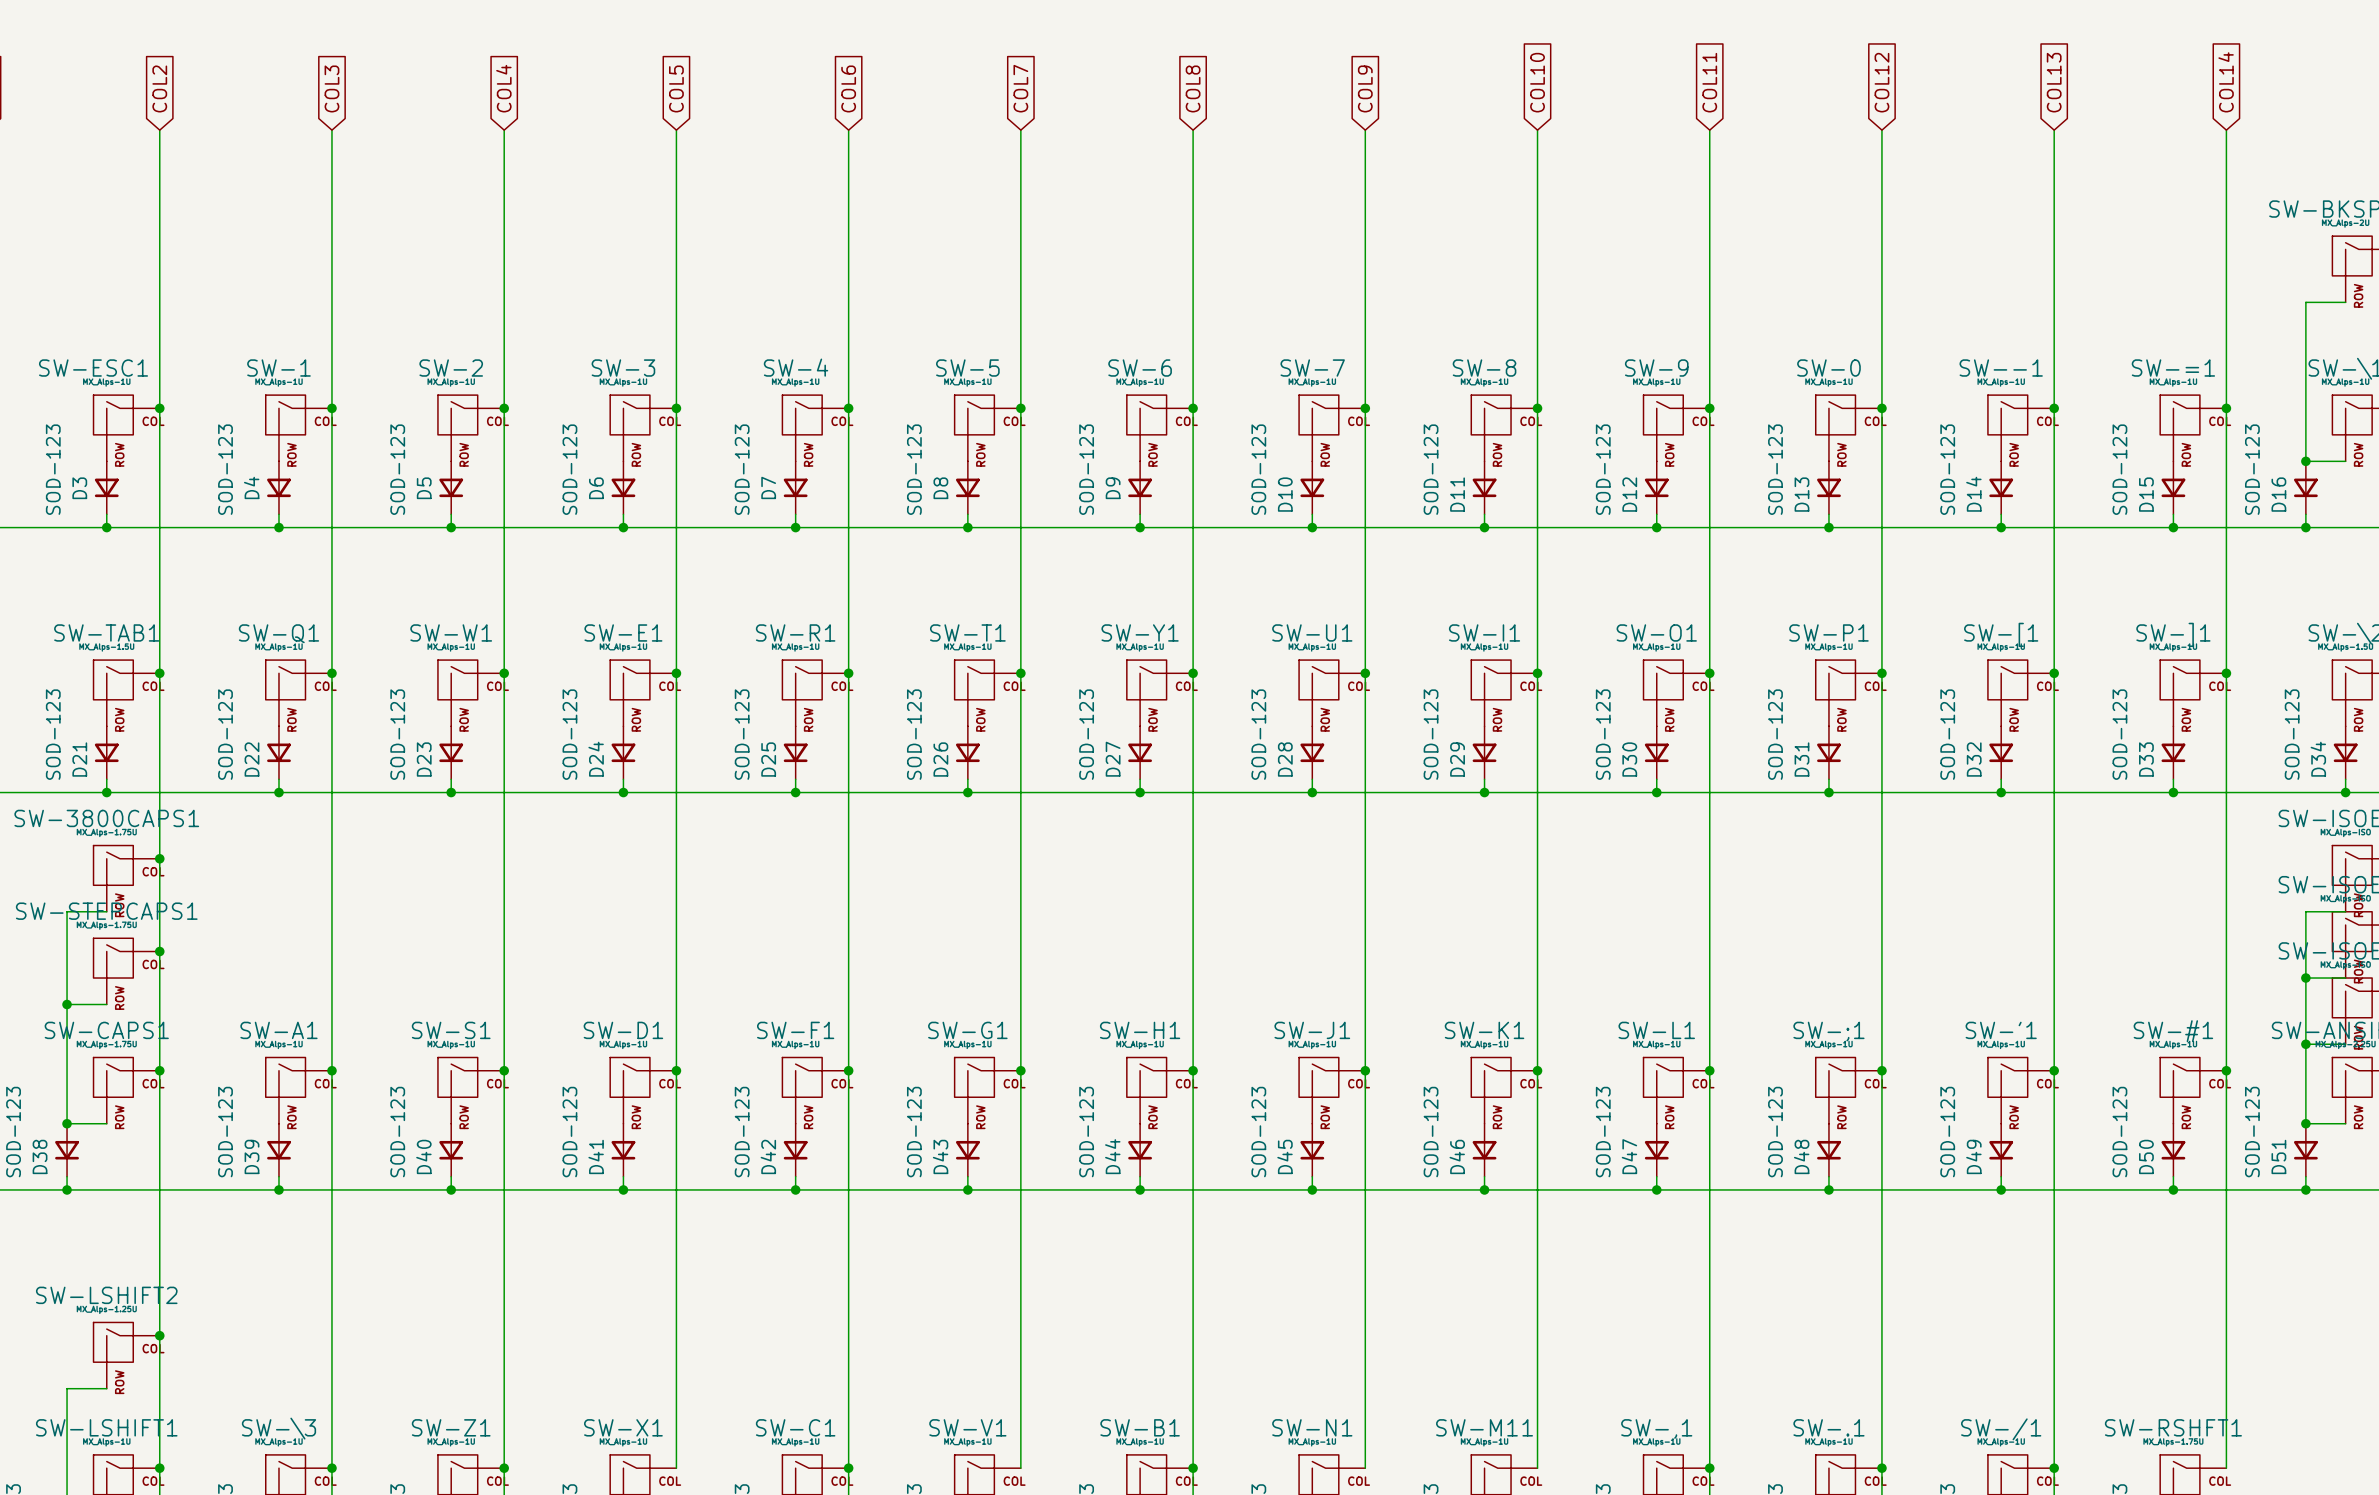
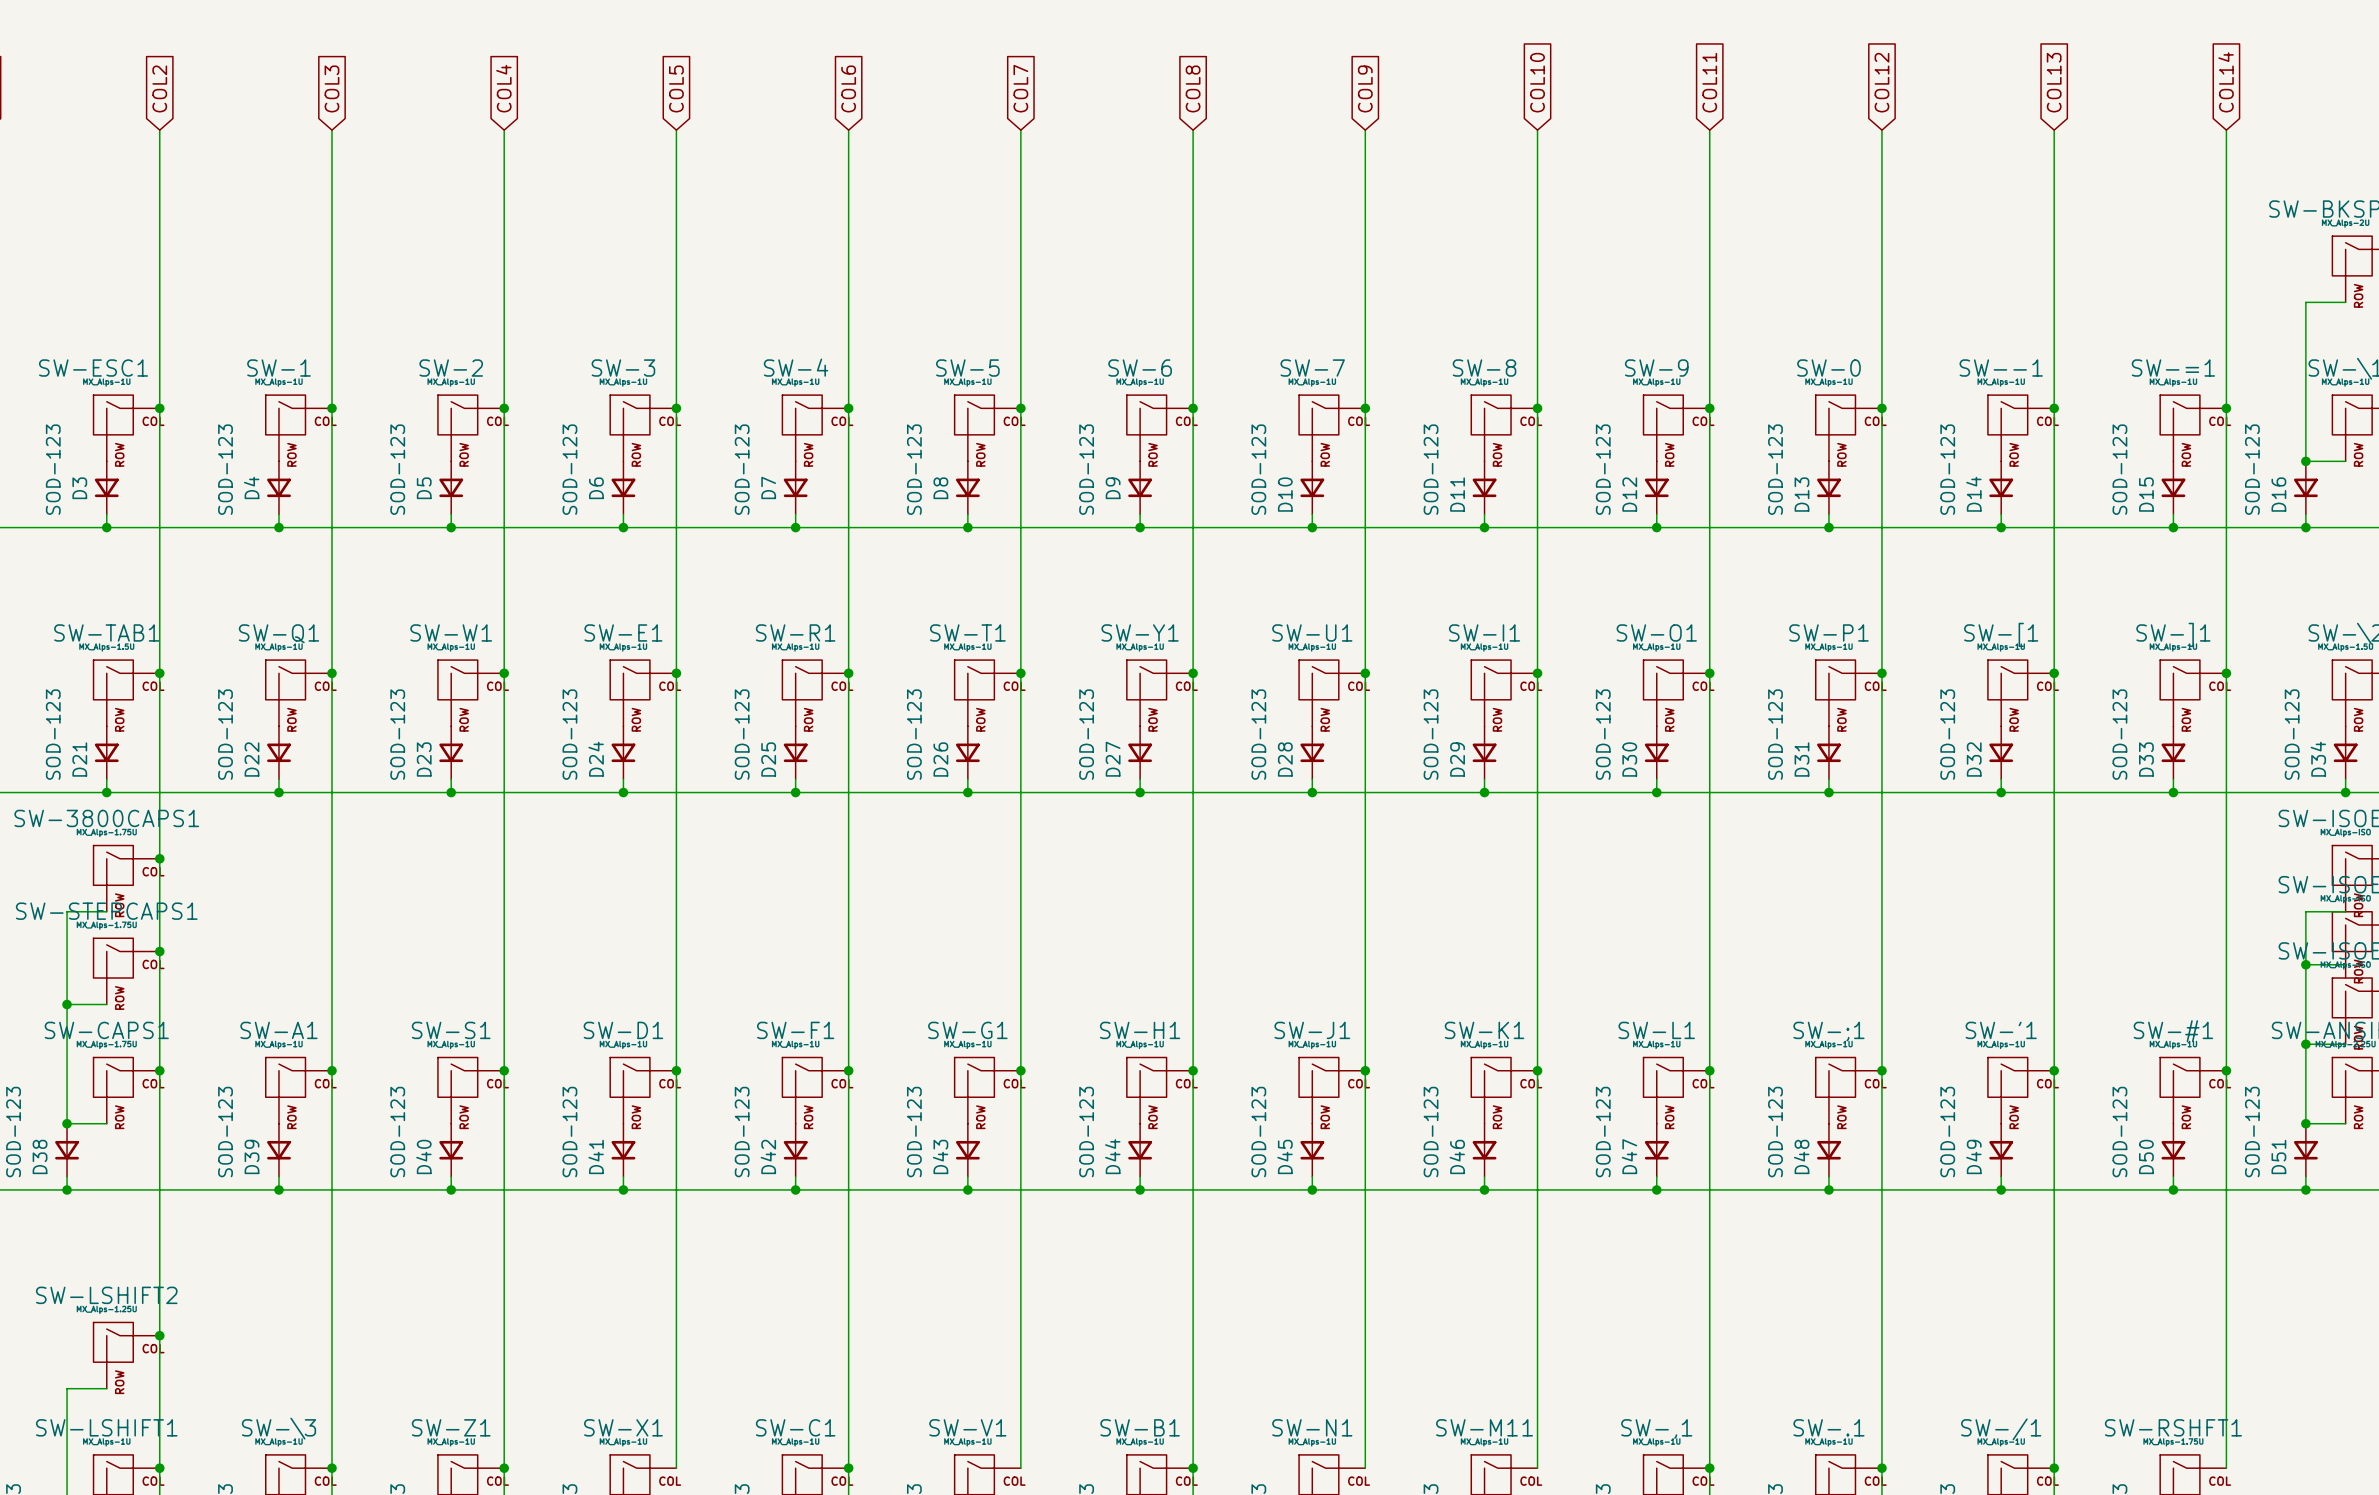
wire: (2305, 978) (2345, 978) -> (2305, 964) (2345, 964)
junction position: (2305, 978) -> (2305, 964)

